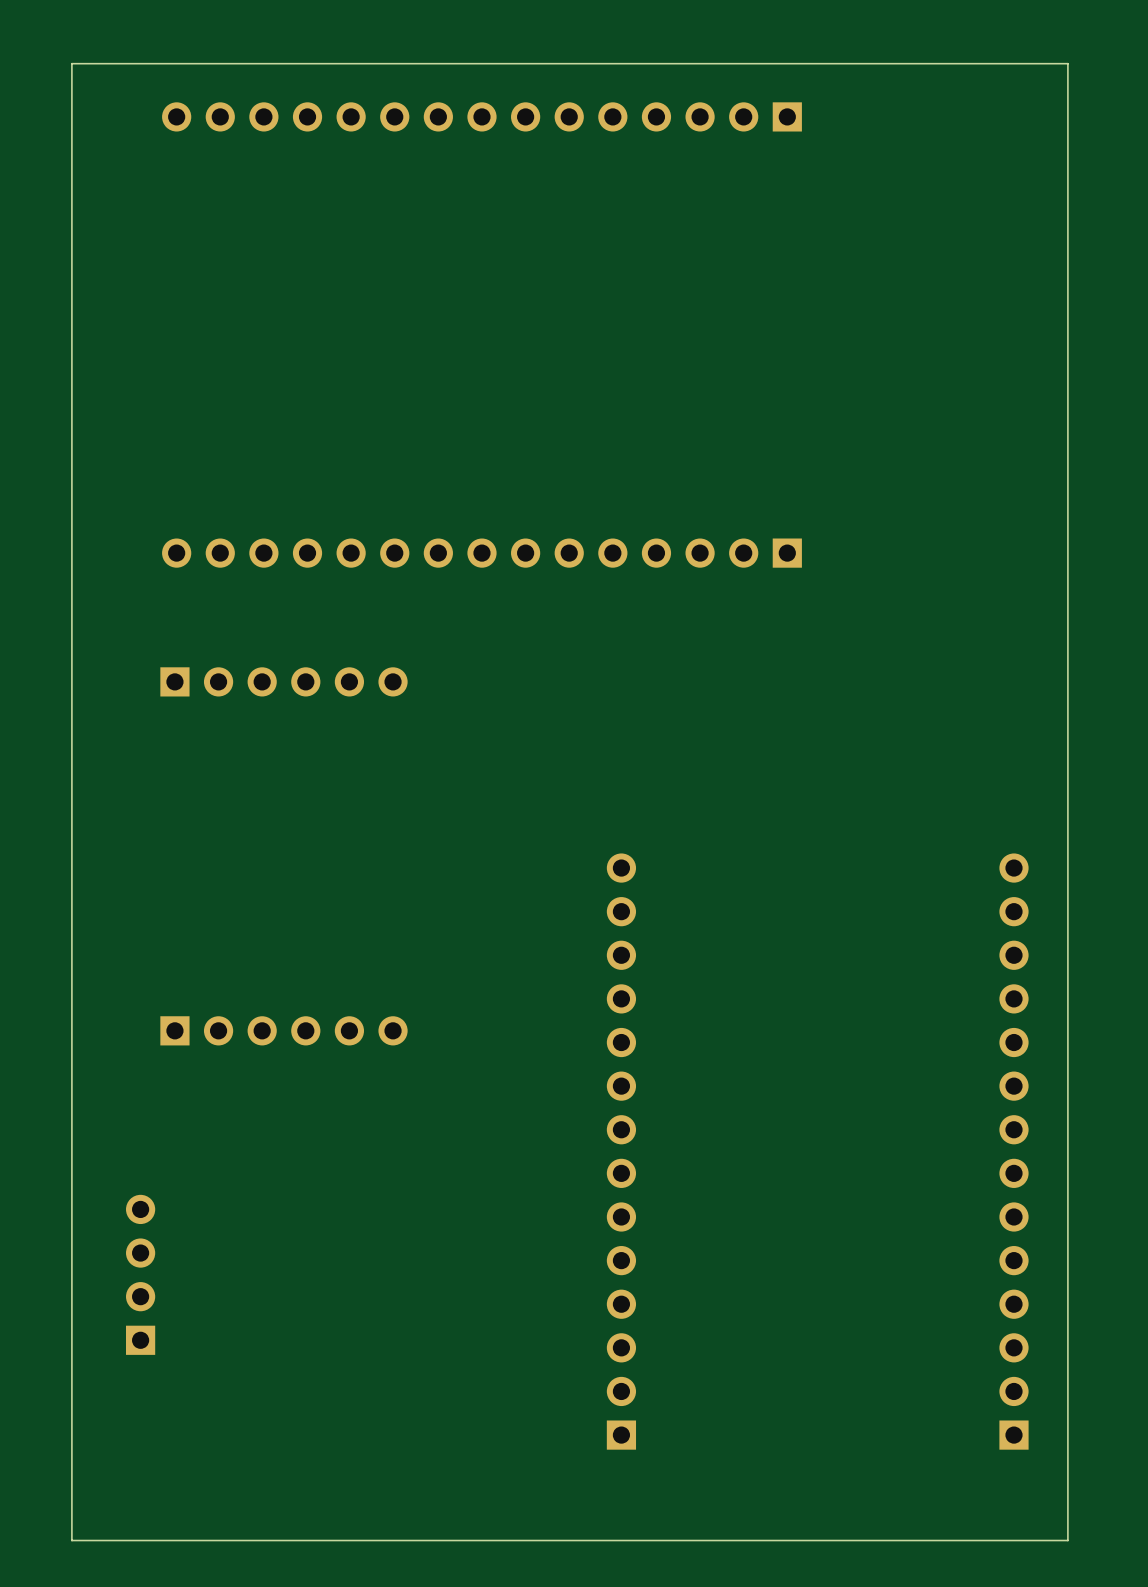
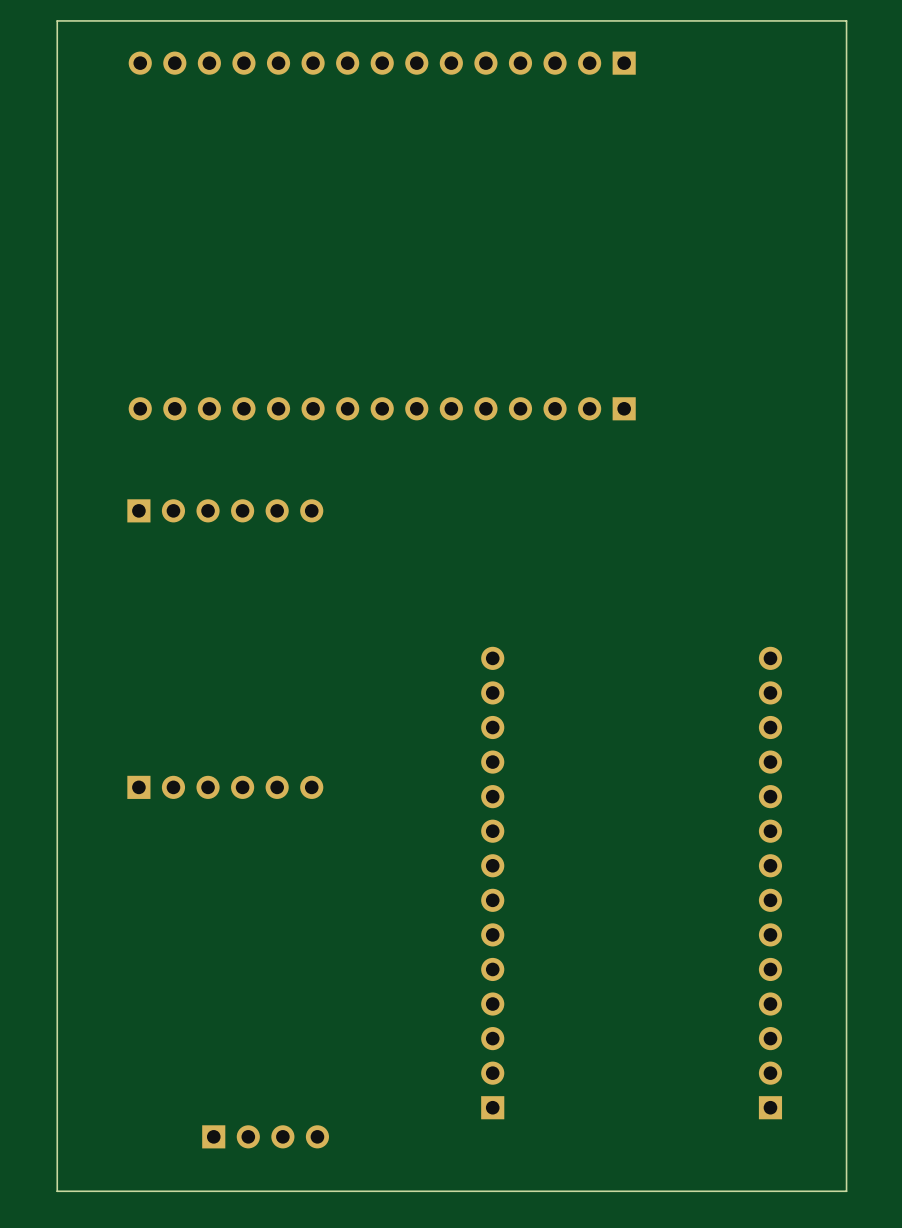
part position: (1013, 1151) -> (770, 883)
part rotation: 0° (140, 1274) -> 90° clockwise (265, 1136)
part position: (140, 1274) -> (265, 1136)

